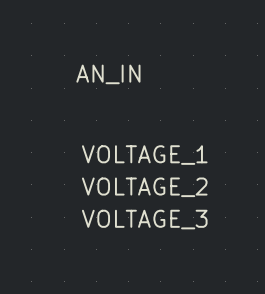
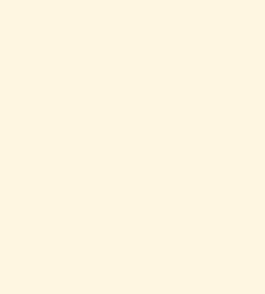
label: AN_IN (108, 74) -> none
label: VOLTAGE_1 (144, 155) -> none
label: VOLTAGE_2 (144, 187) -> none
label: VOLTAGE_3 (144, 219) -> none

